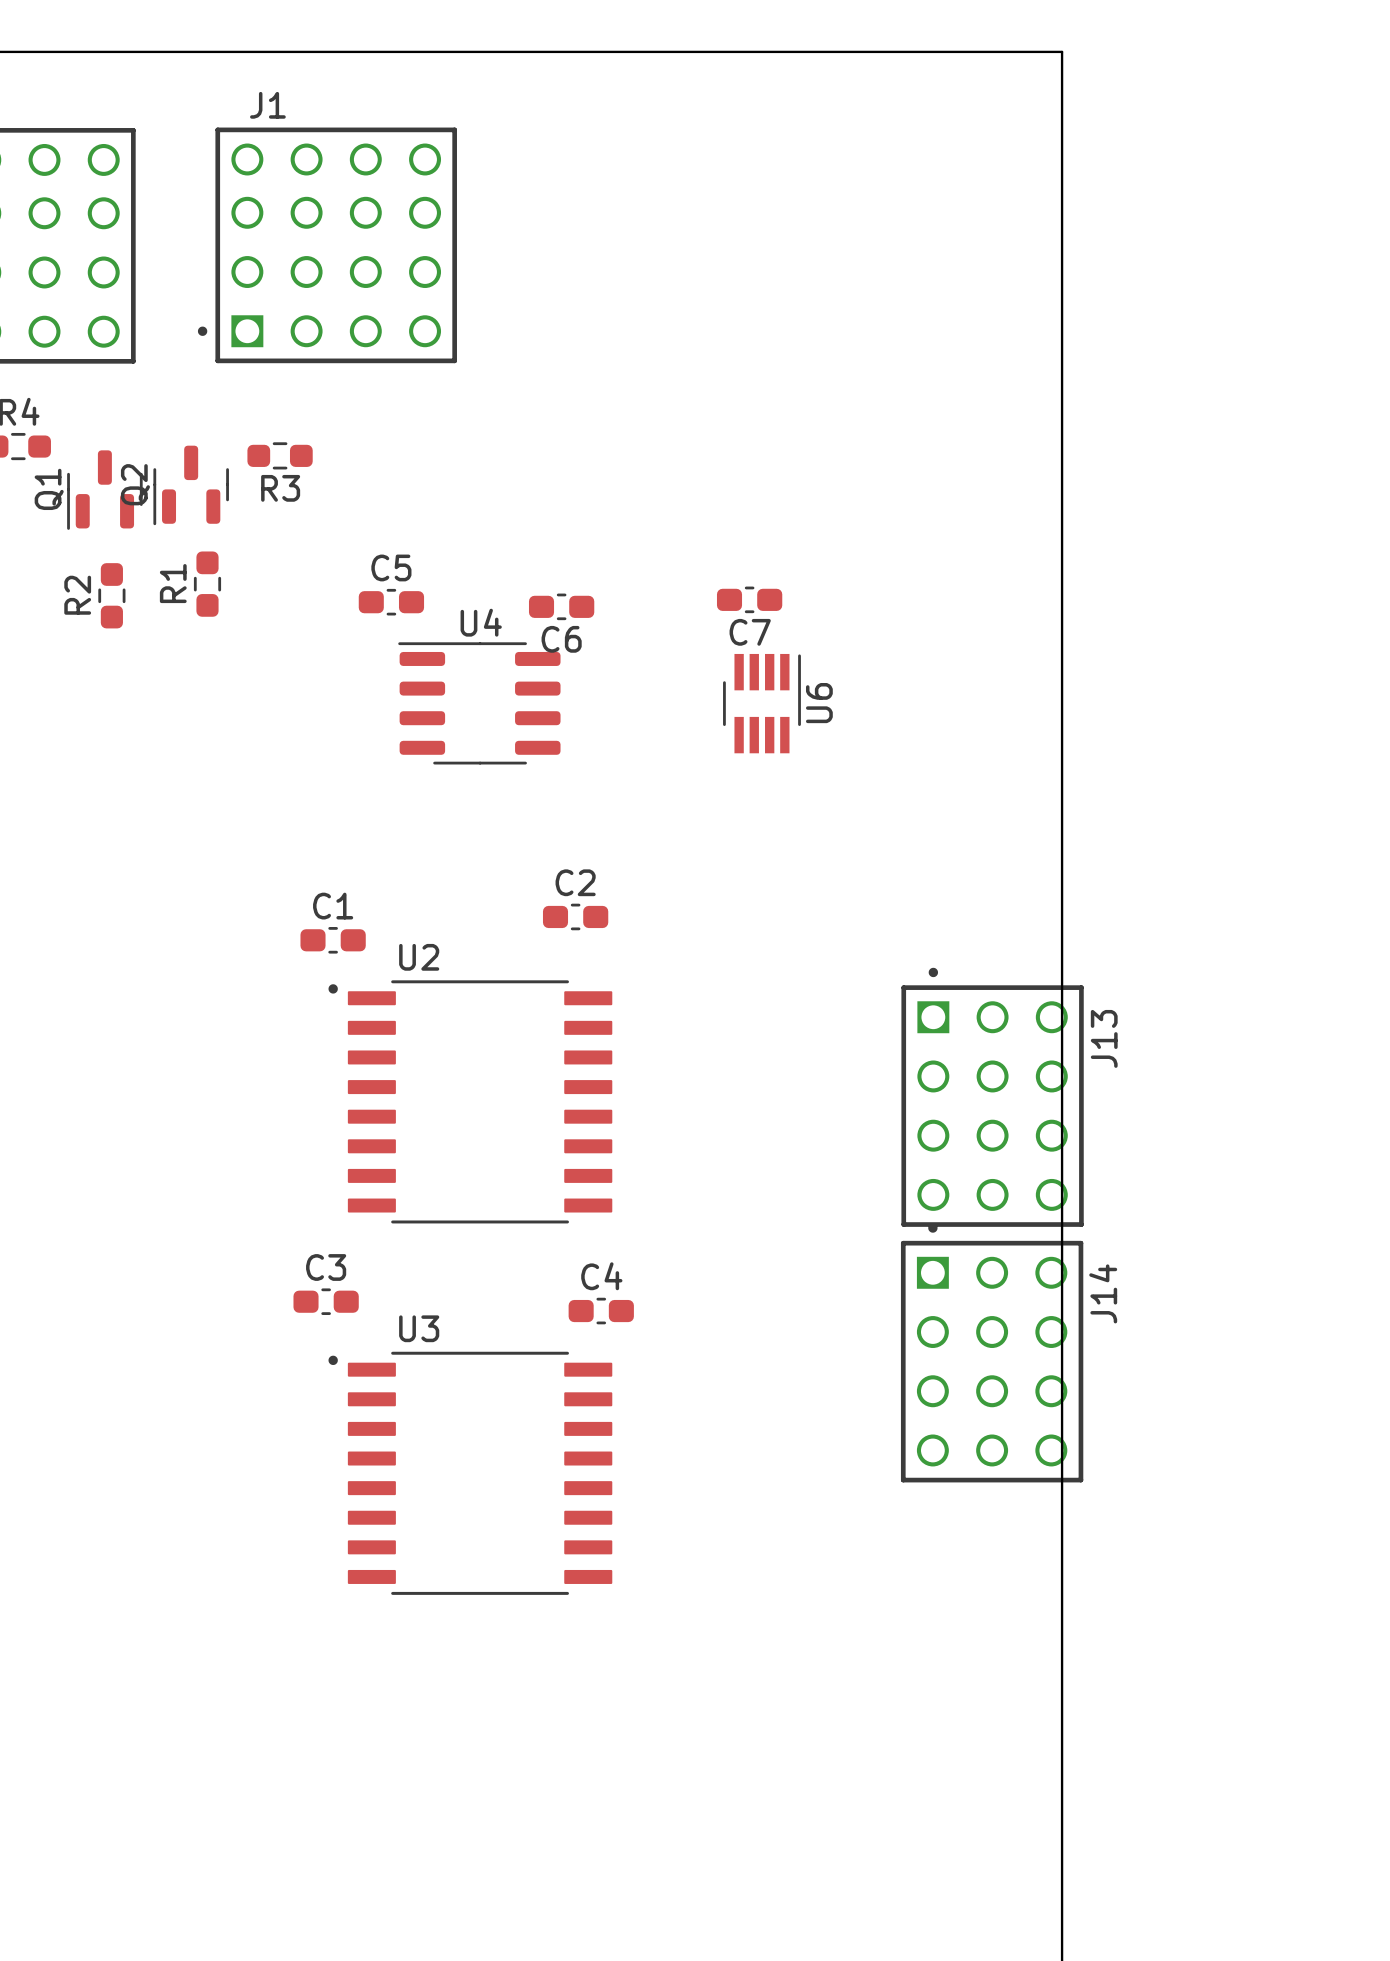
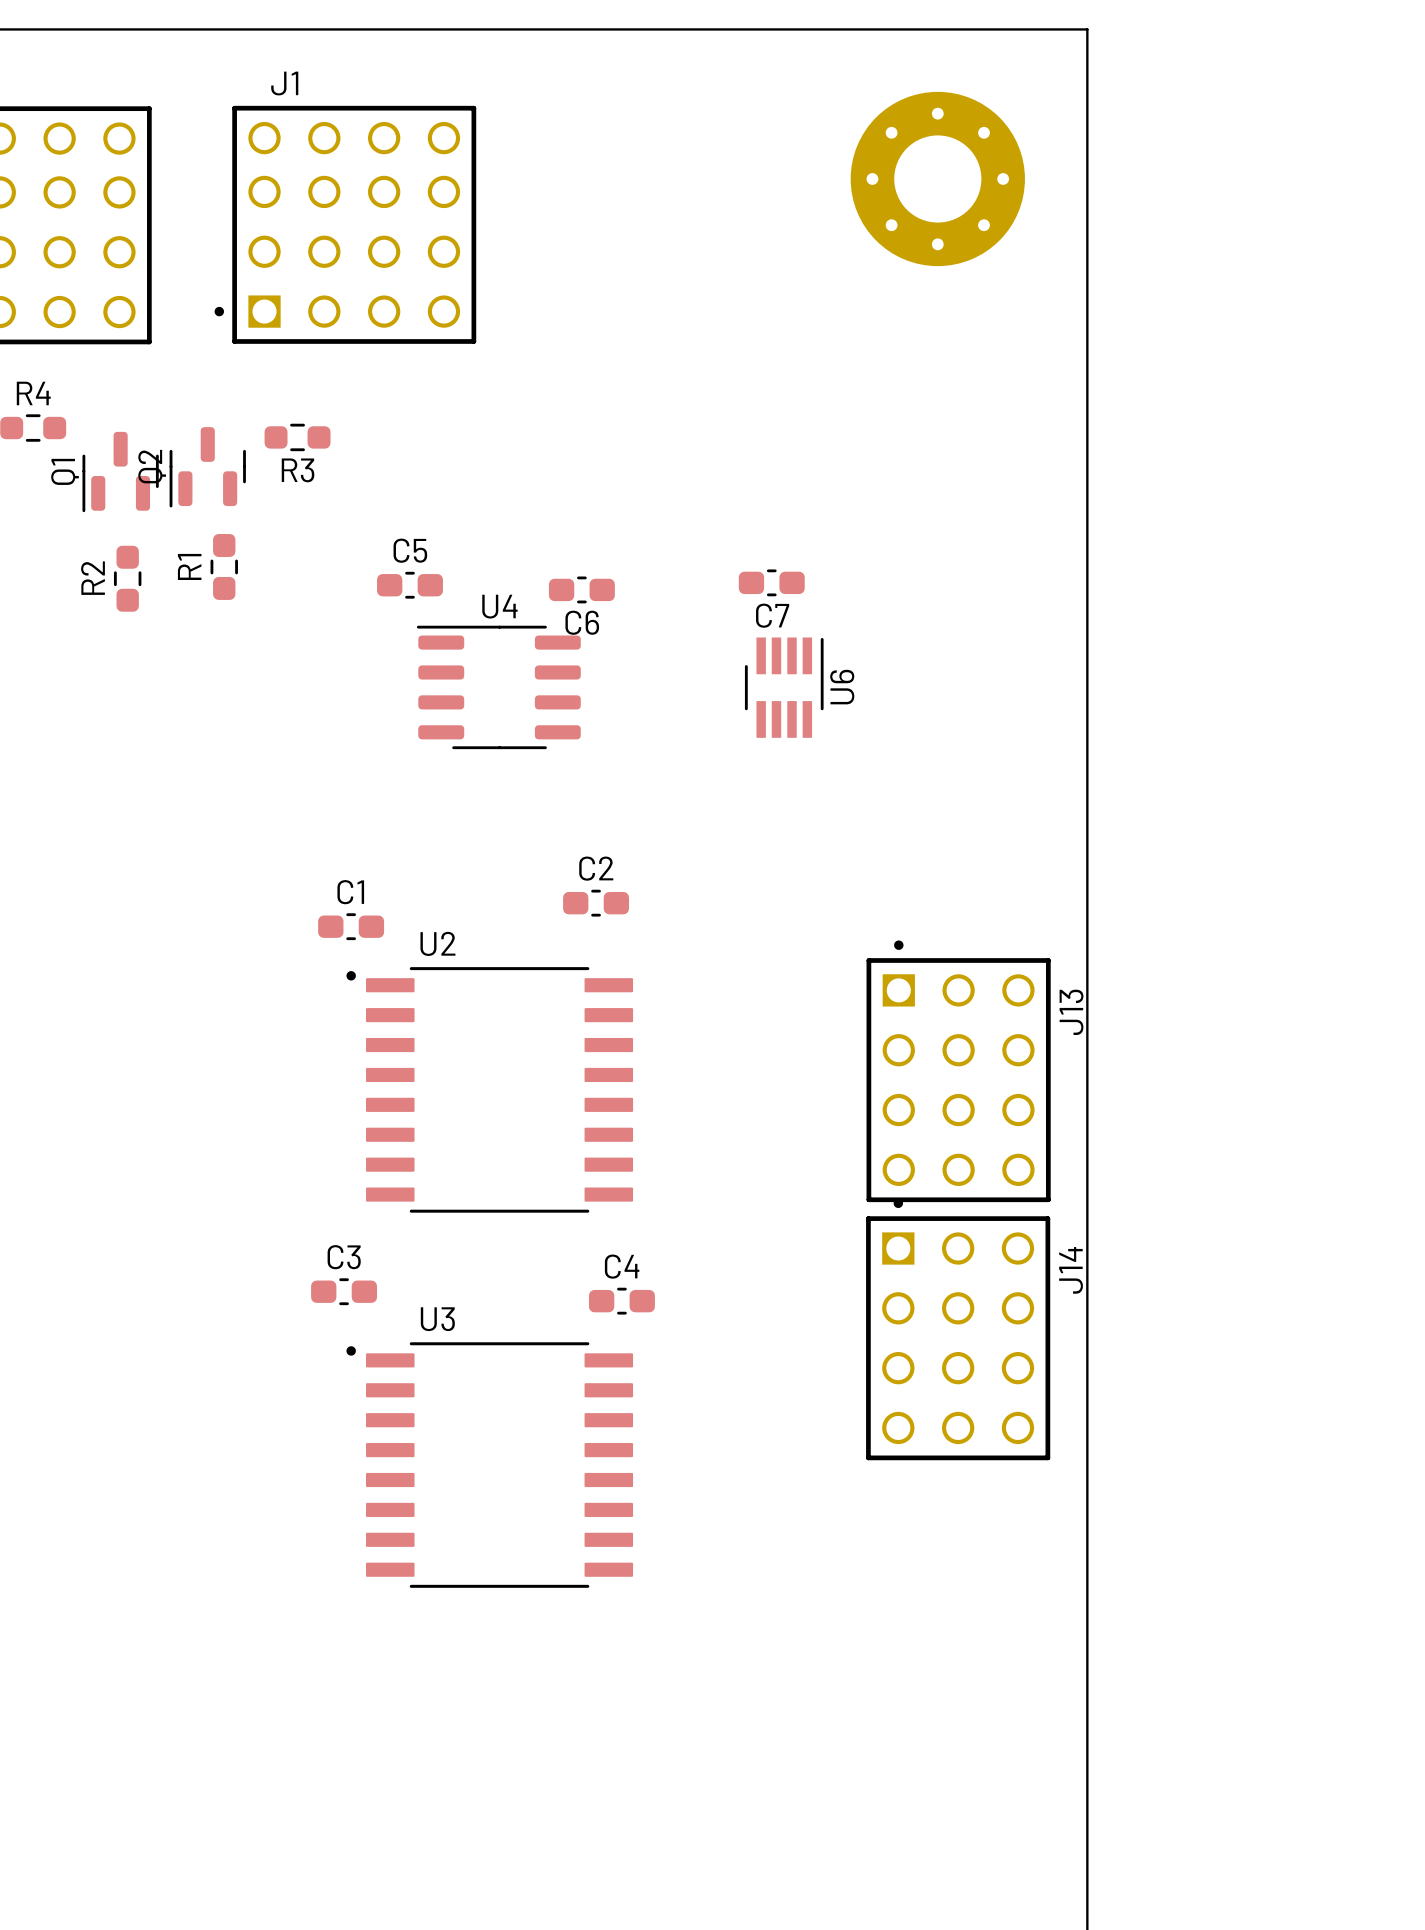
part: none -> (937, 178)
J13 position: (992, 1097) -> (958, 1071)
J14 position: (992, 1352) -> (958, 1329)

